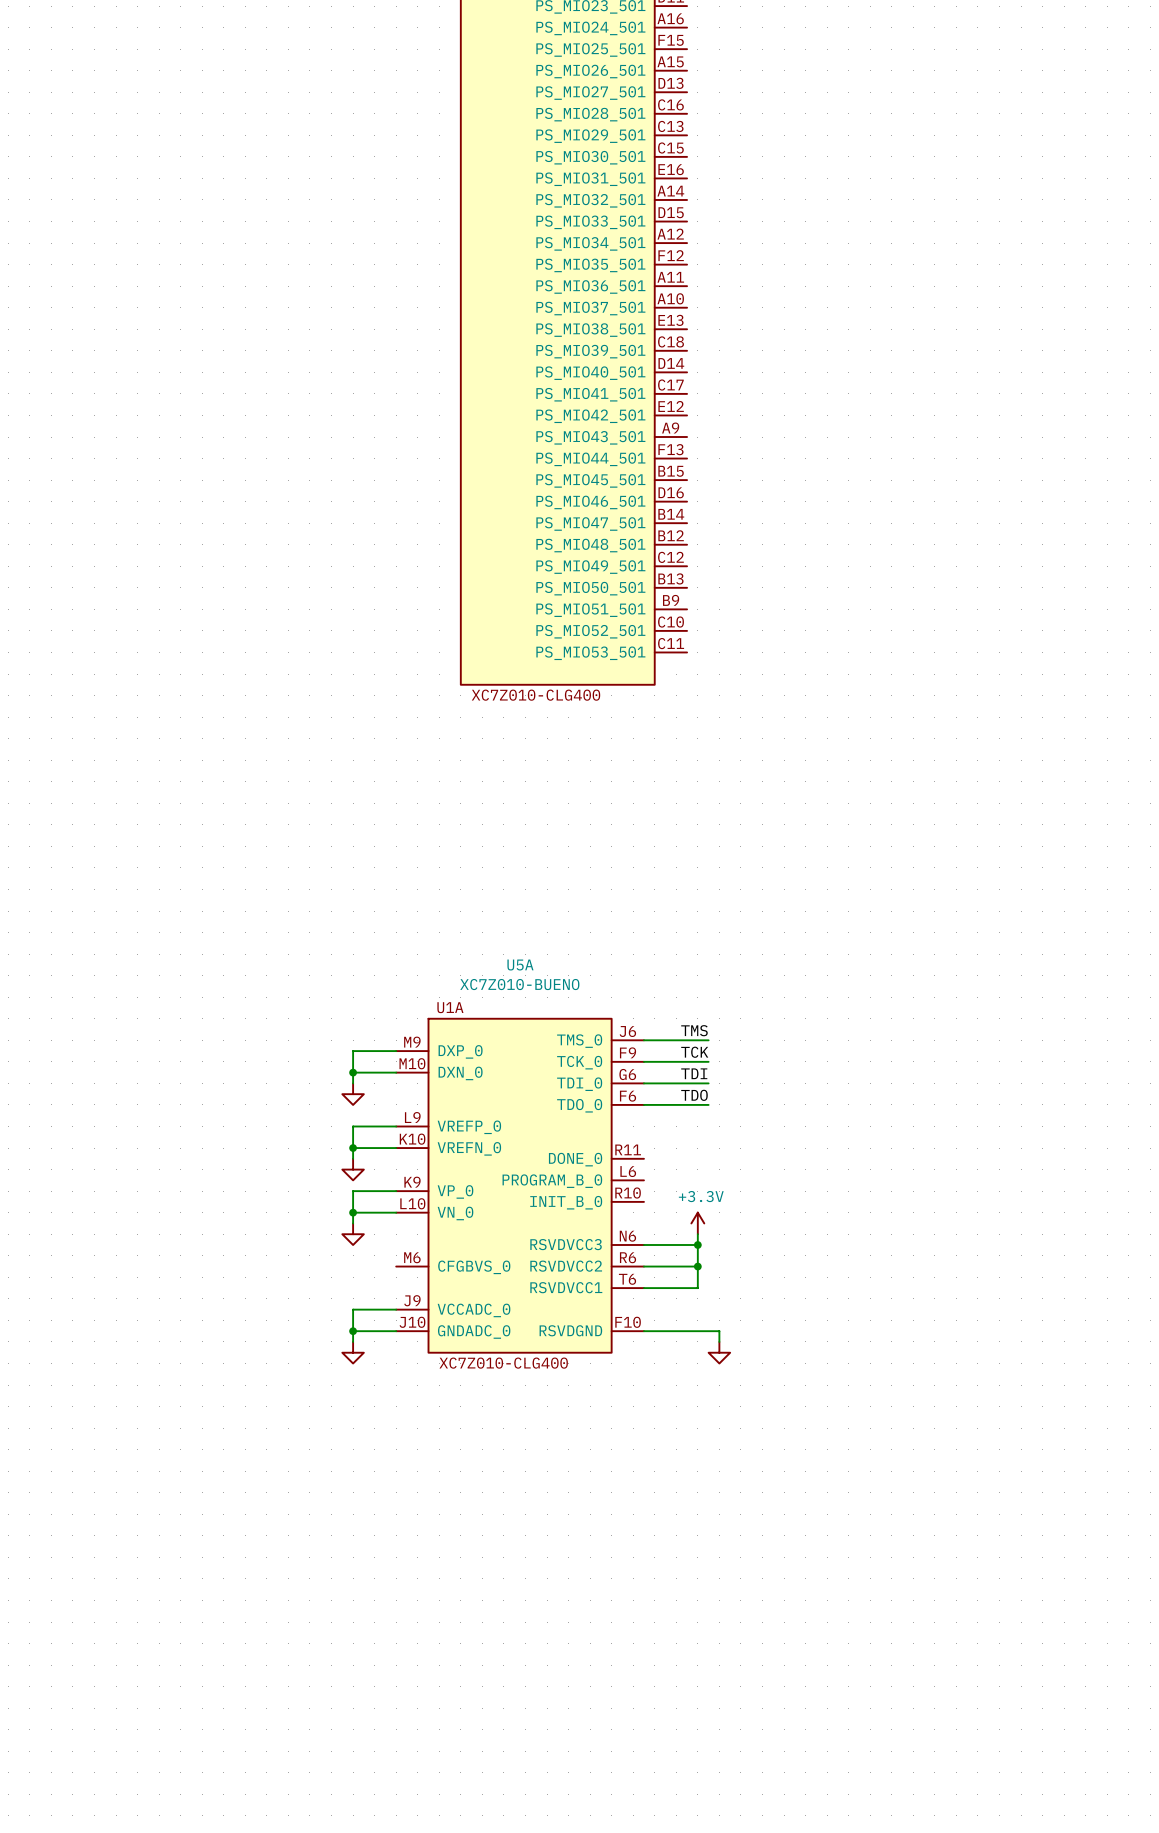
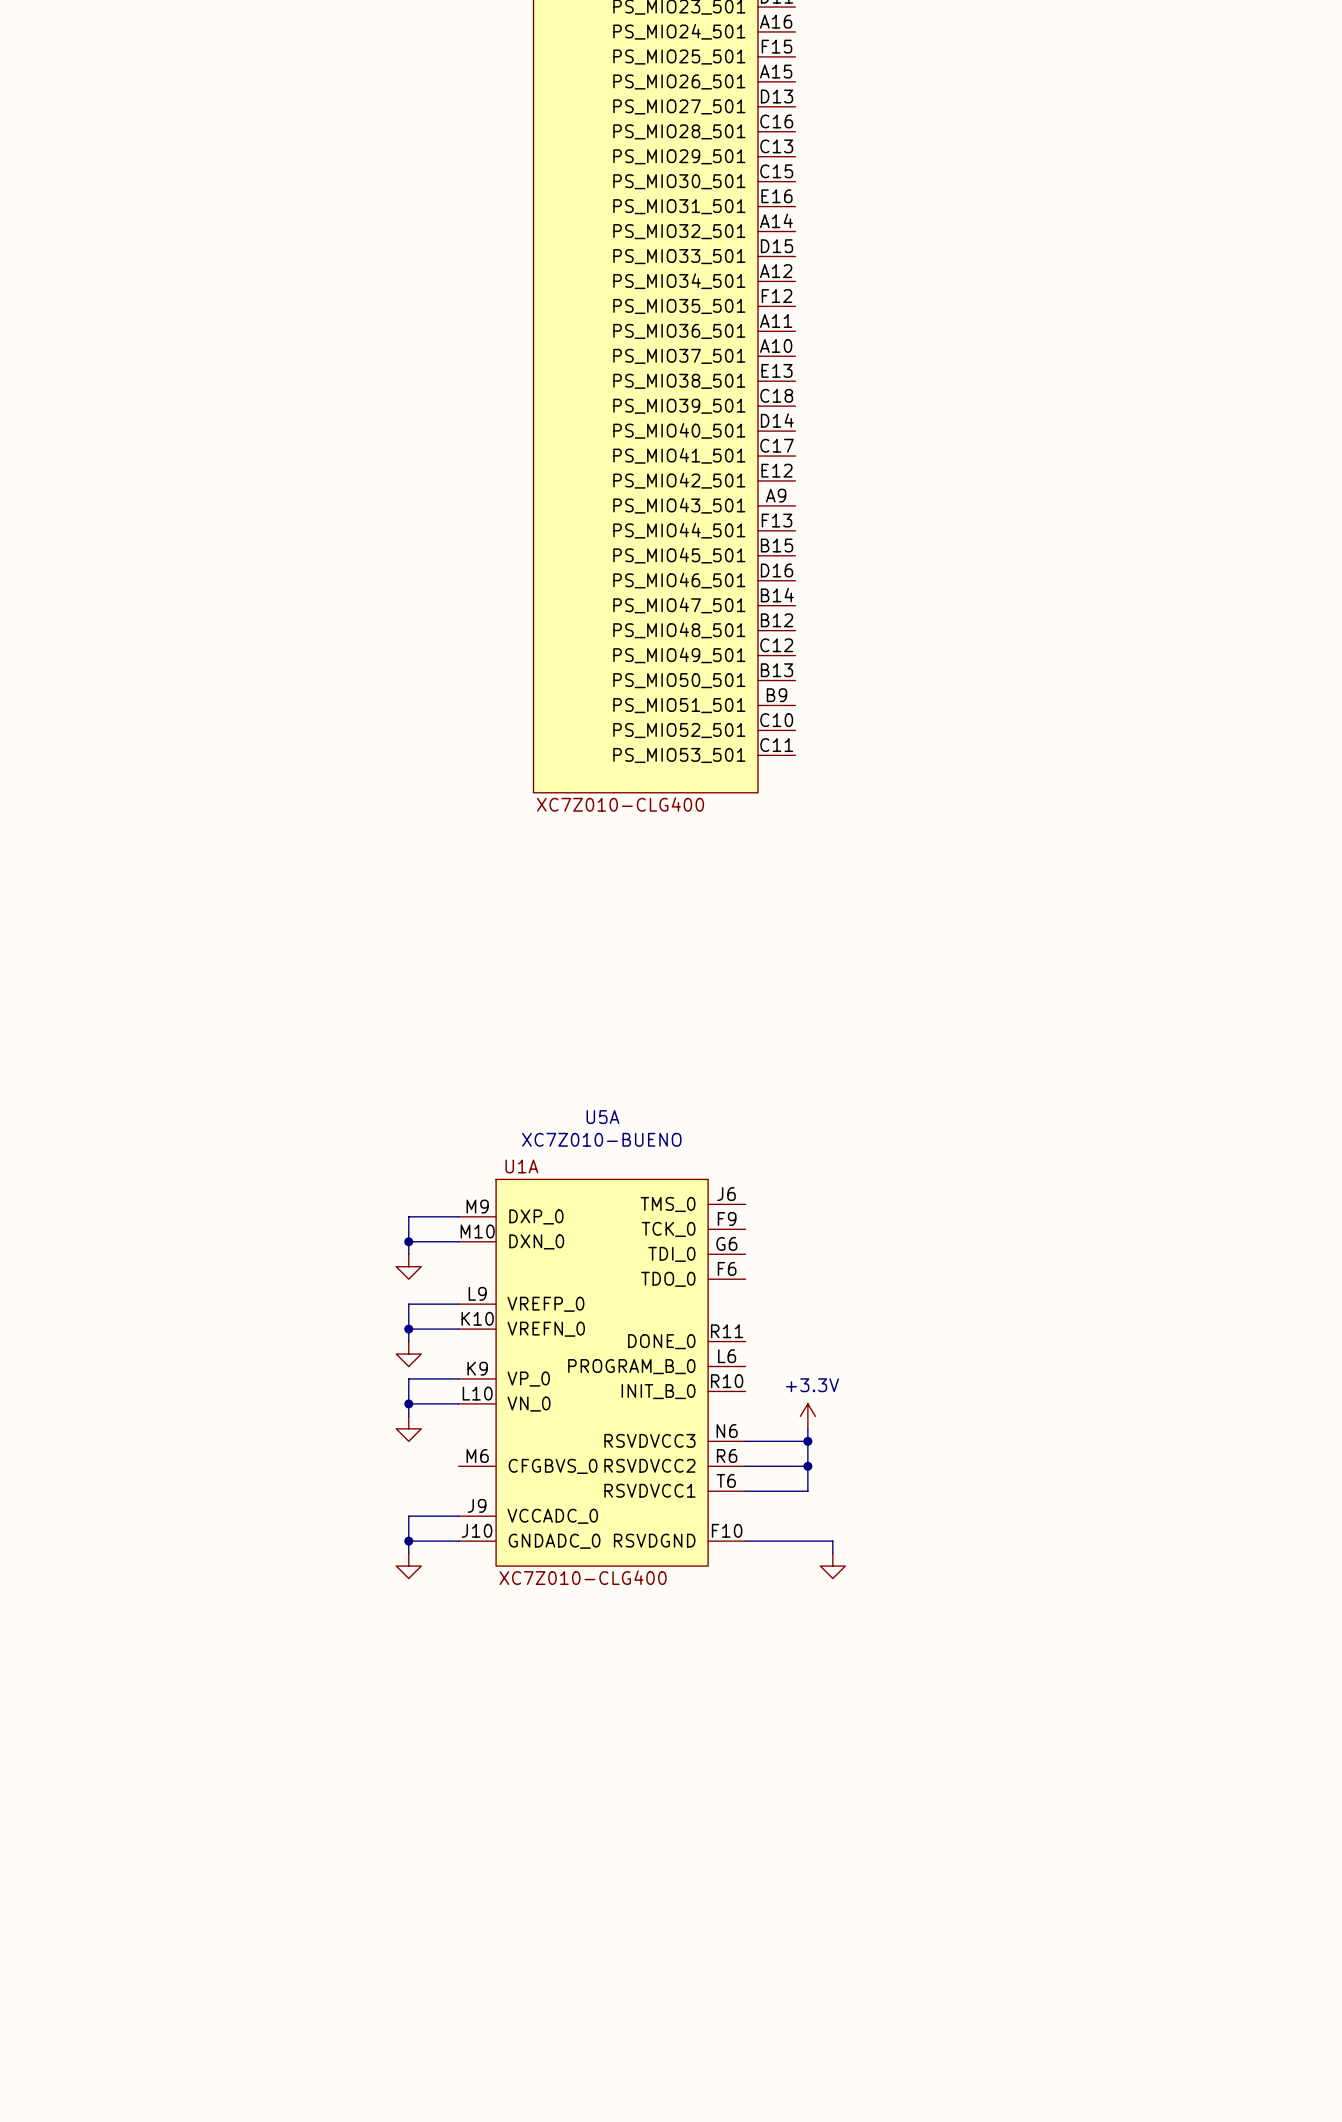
label: TMS (694, 1030) -> none
wire: (643, 1040) (708, 1040) -> none
label: TCK (694, 1052) -> none
wire: (643, 1061) (708, 1061) -> none
label: TDI (694, 1073) -> none
wire: (643, 1083) (708, 1083) -> none
label: TDO (694, 1095) -> none
wire: (643, 1104) (708, 1104) -> none

